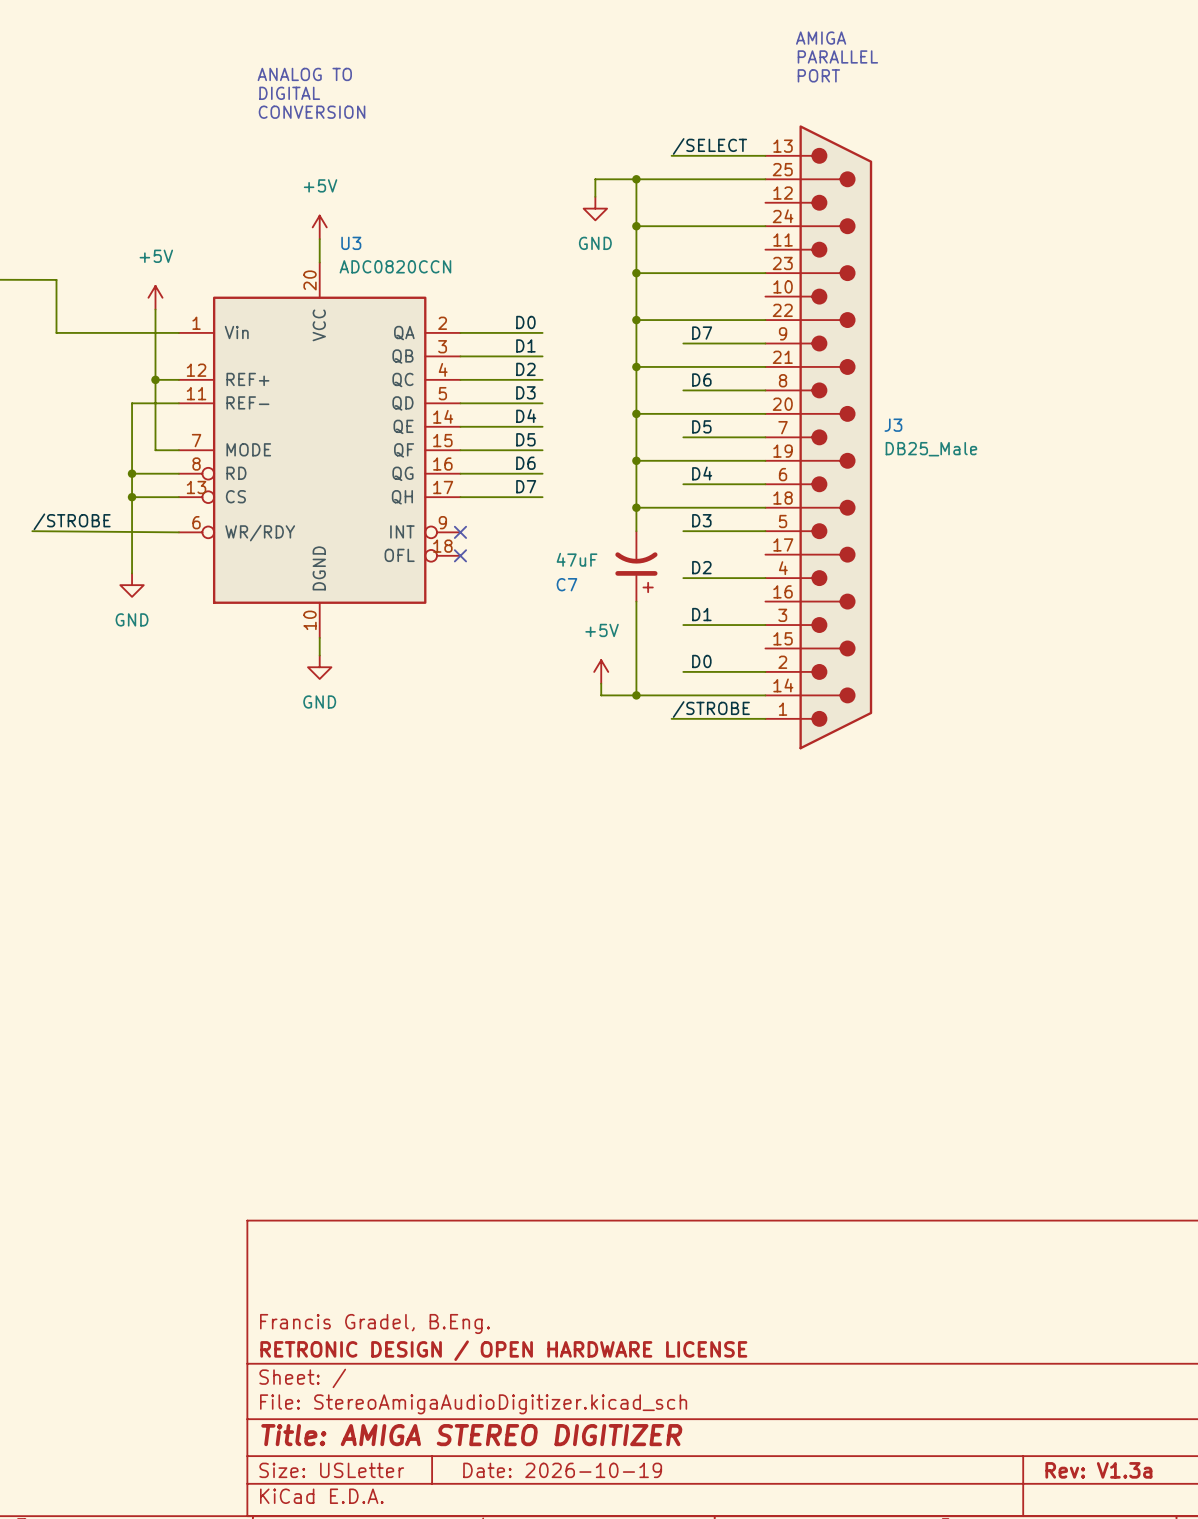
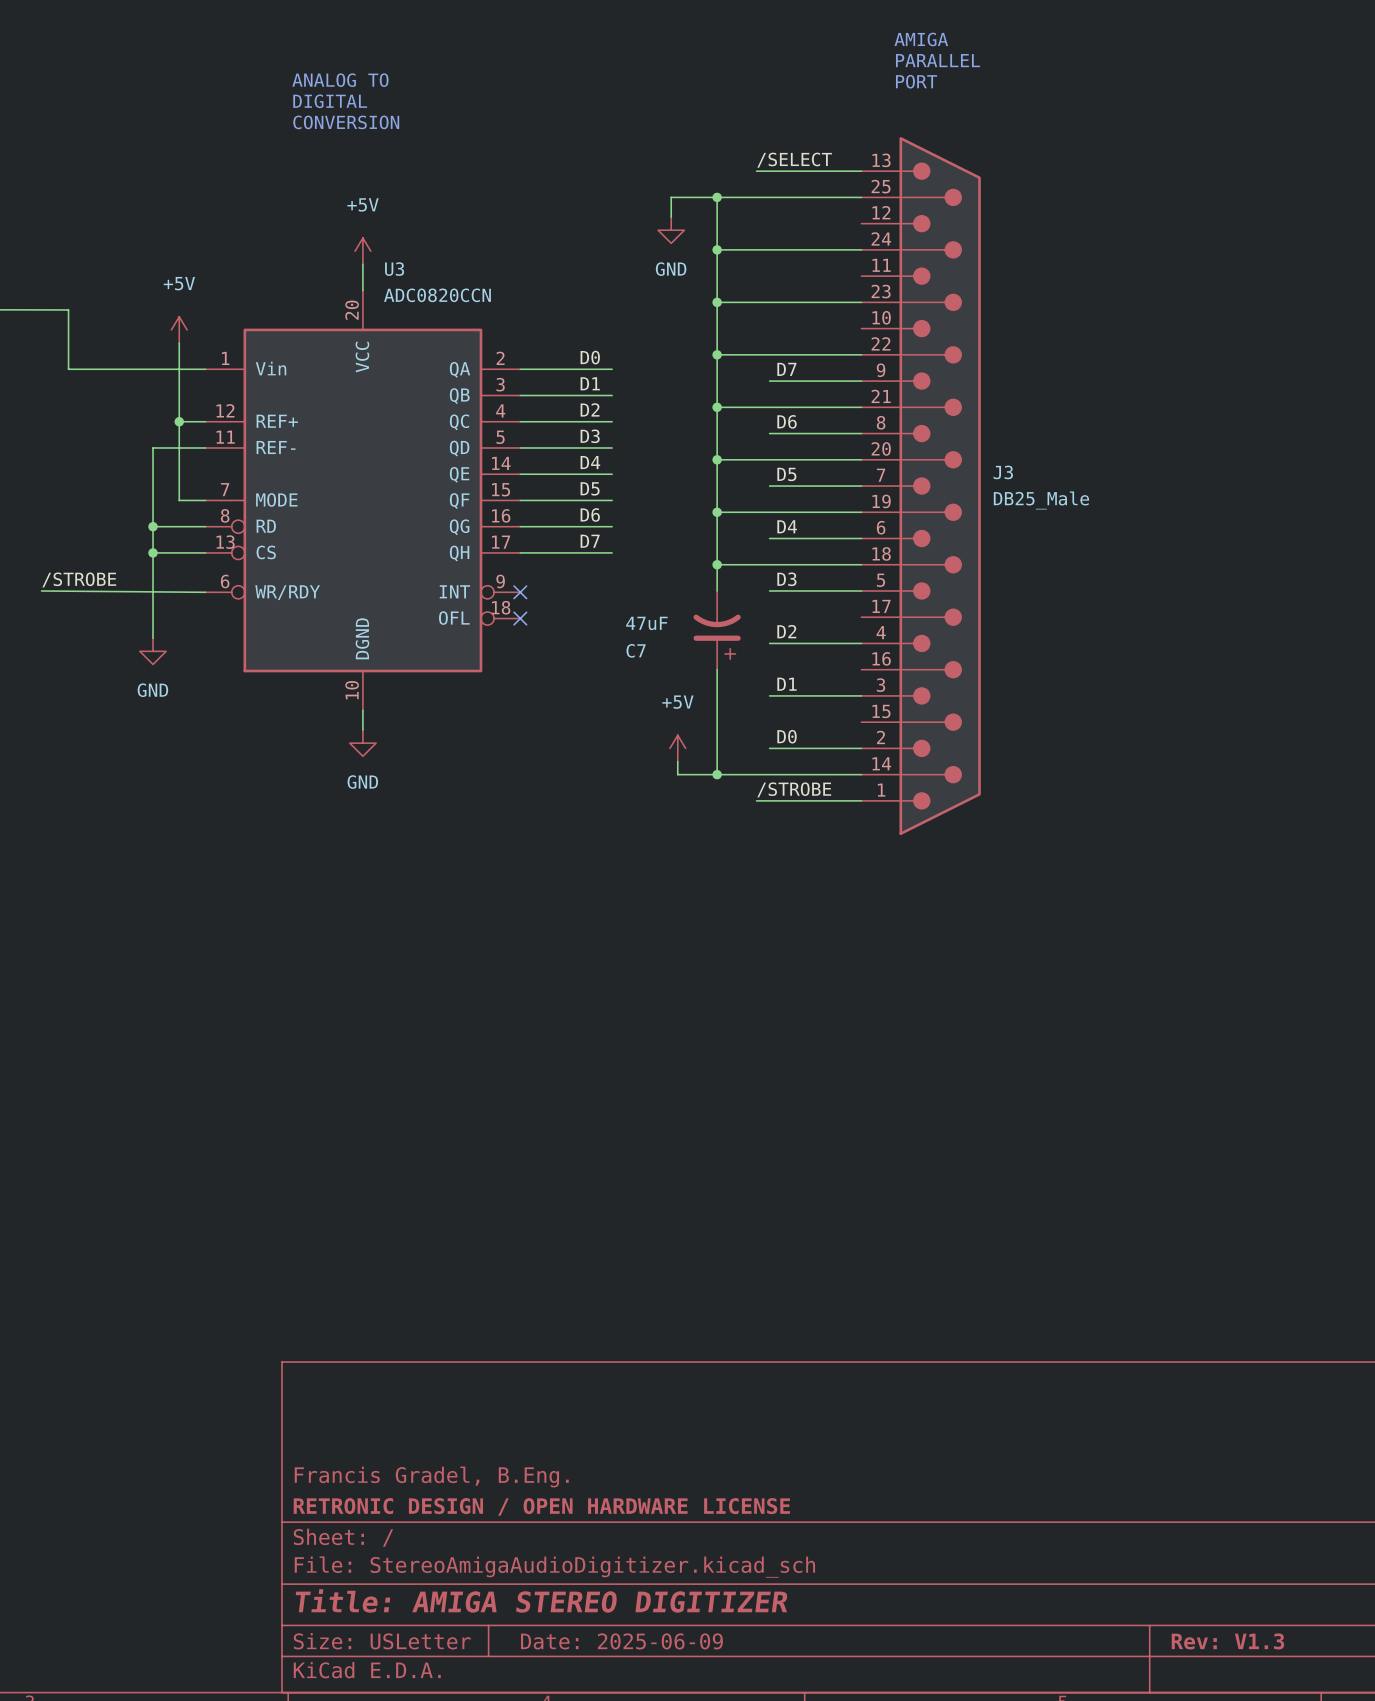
title block: Date: 2026-10-19 (562, 1470) -> Date: 2025-06-09 (621, 1641)
title block: Rev: V1.3a (1098, 1470) -> Rev: V1.3 (1227, 1641)

